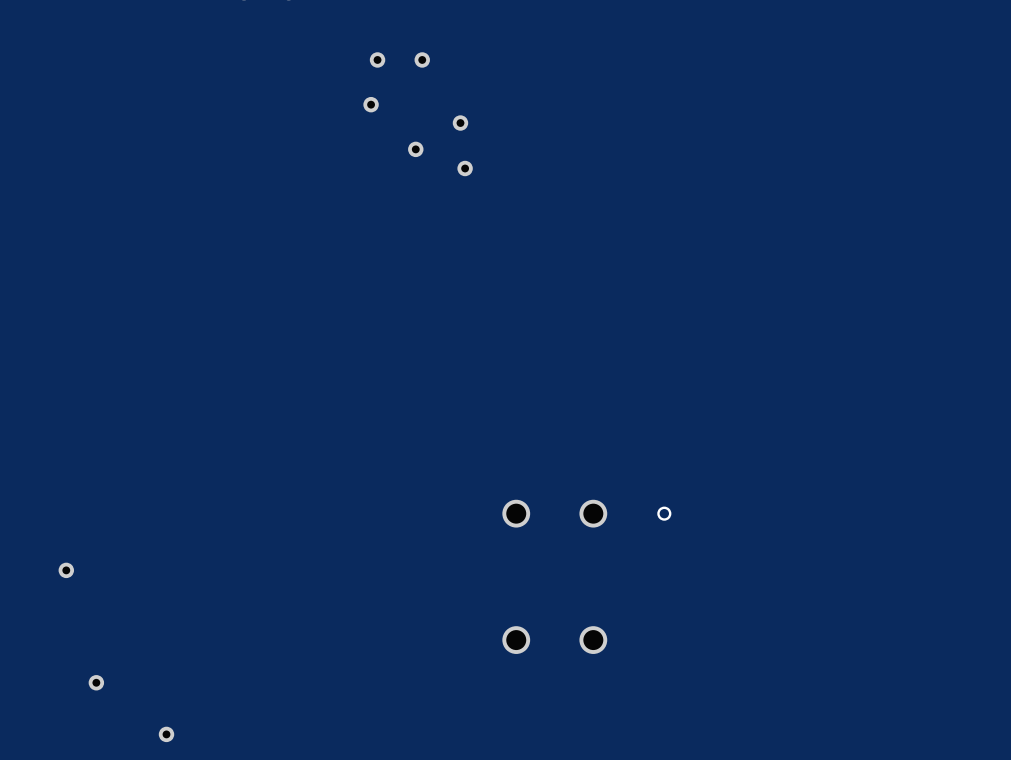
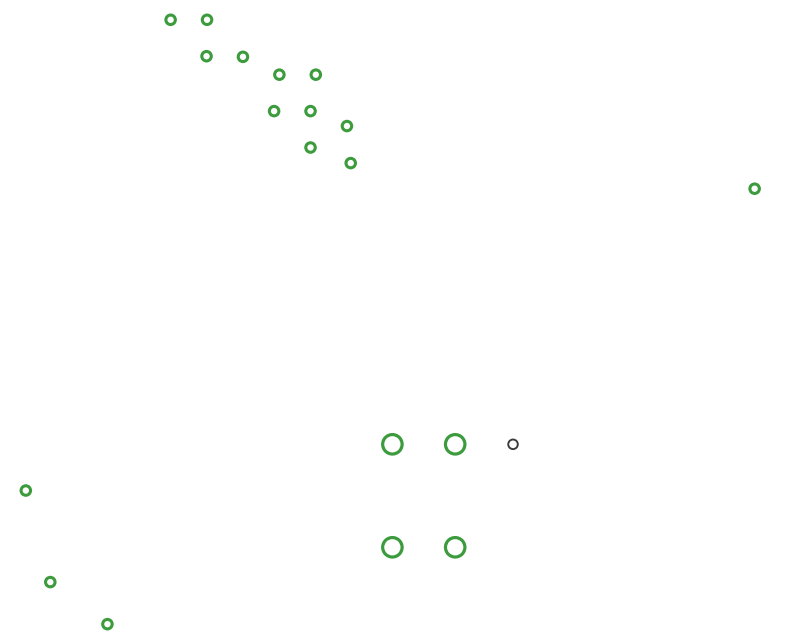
part: none -> (206, 56)
part: none -> (242, 56)
part: none -> (310, 111)
part: none -> (754, 188)

